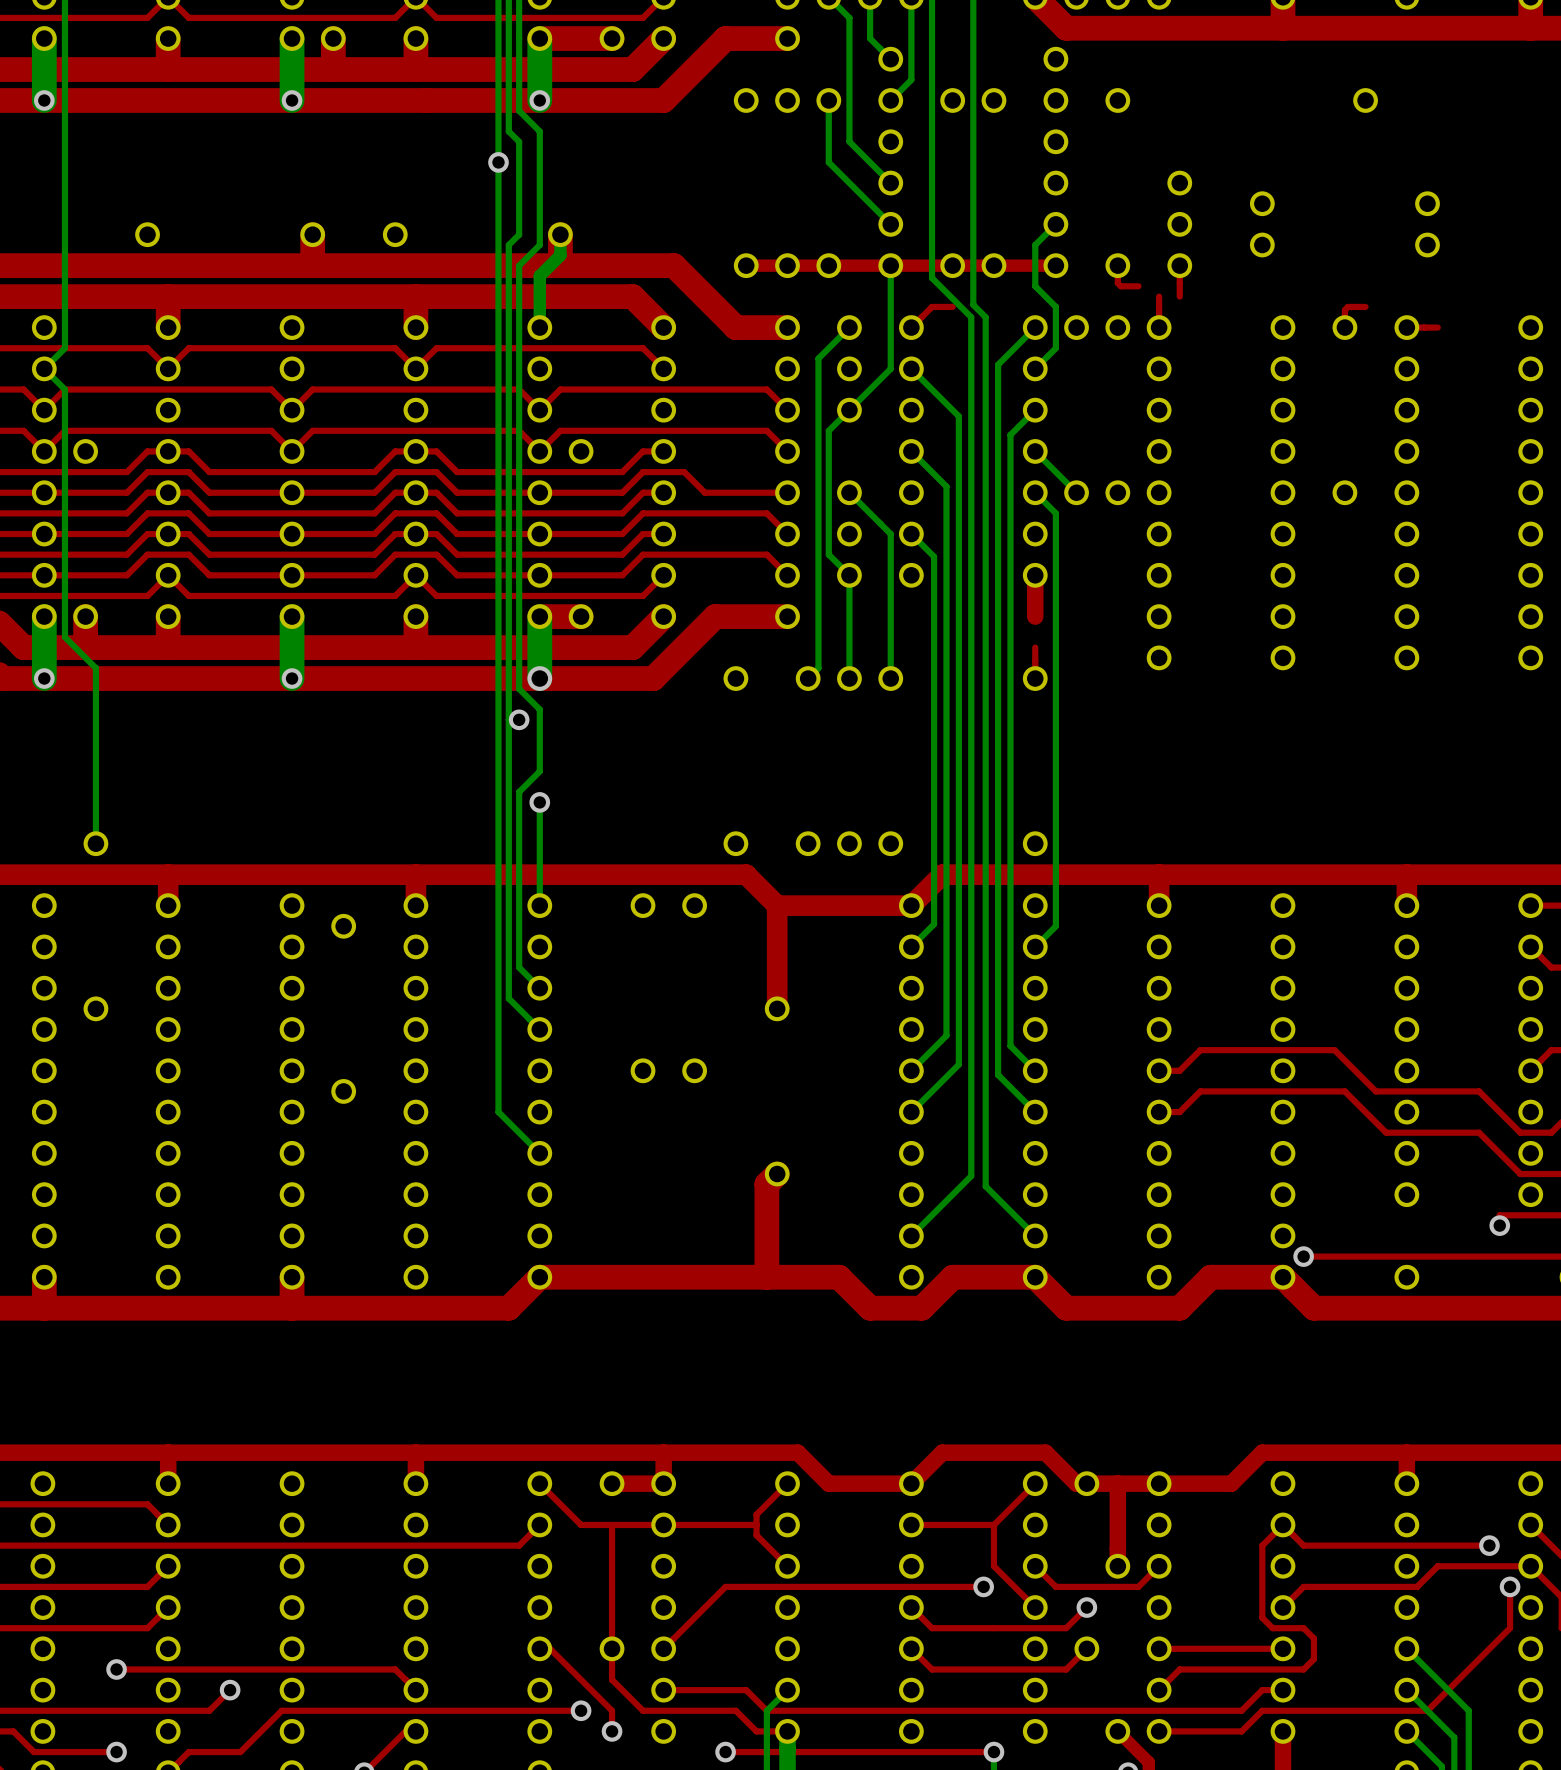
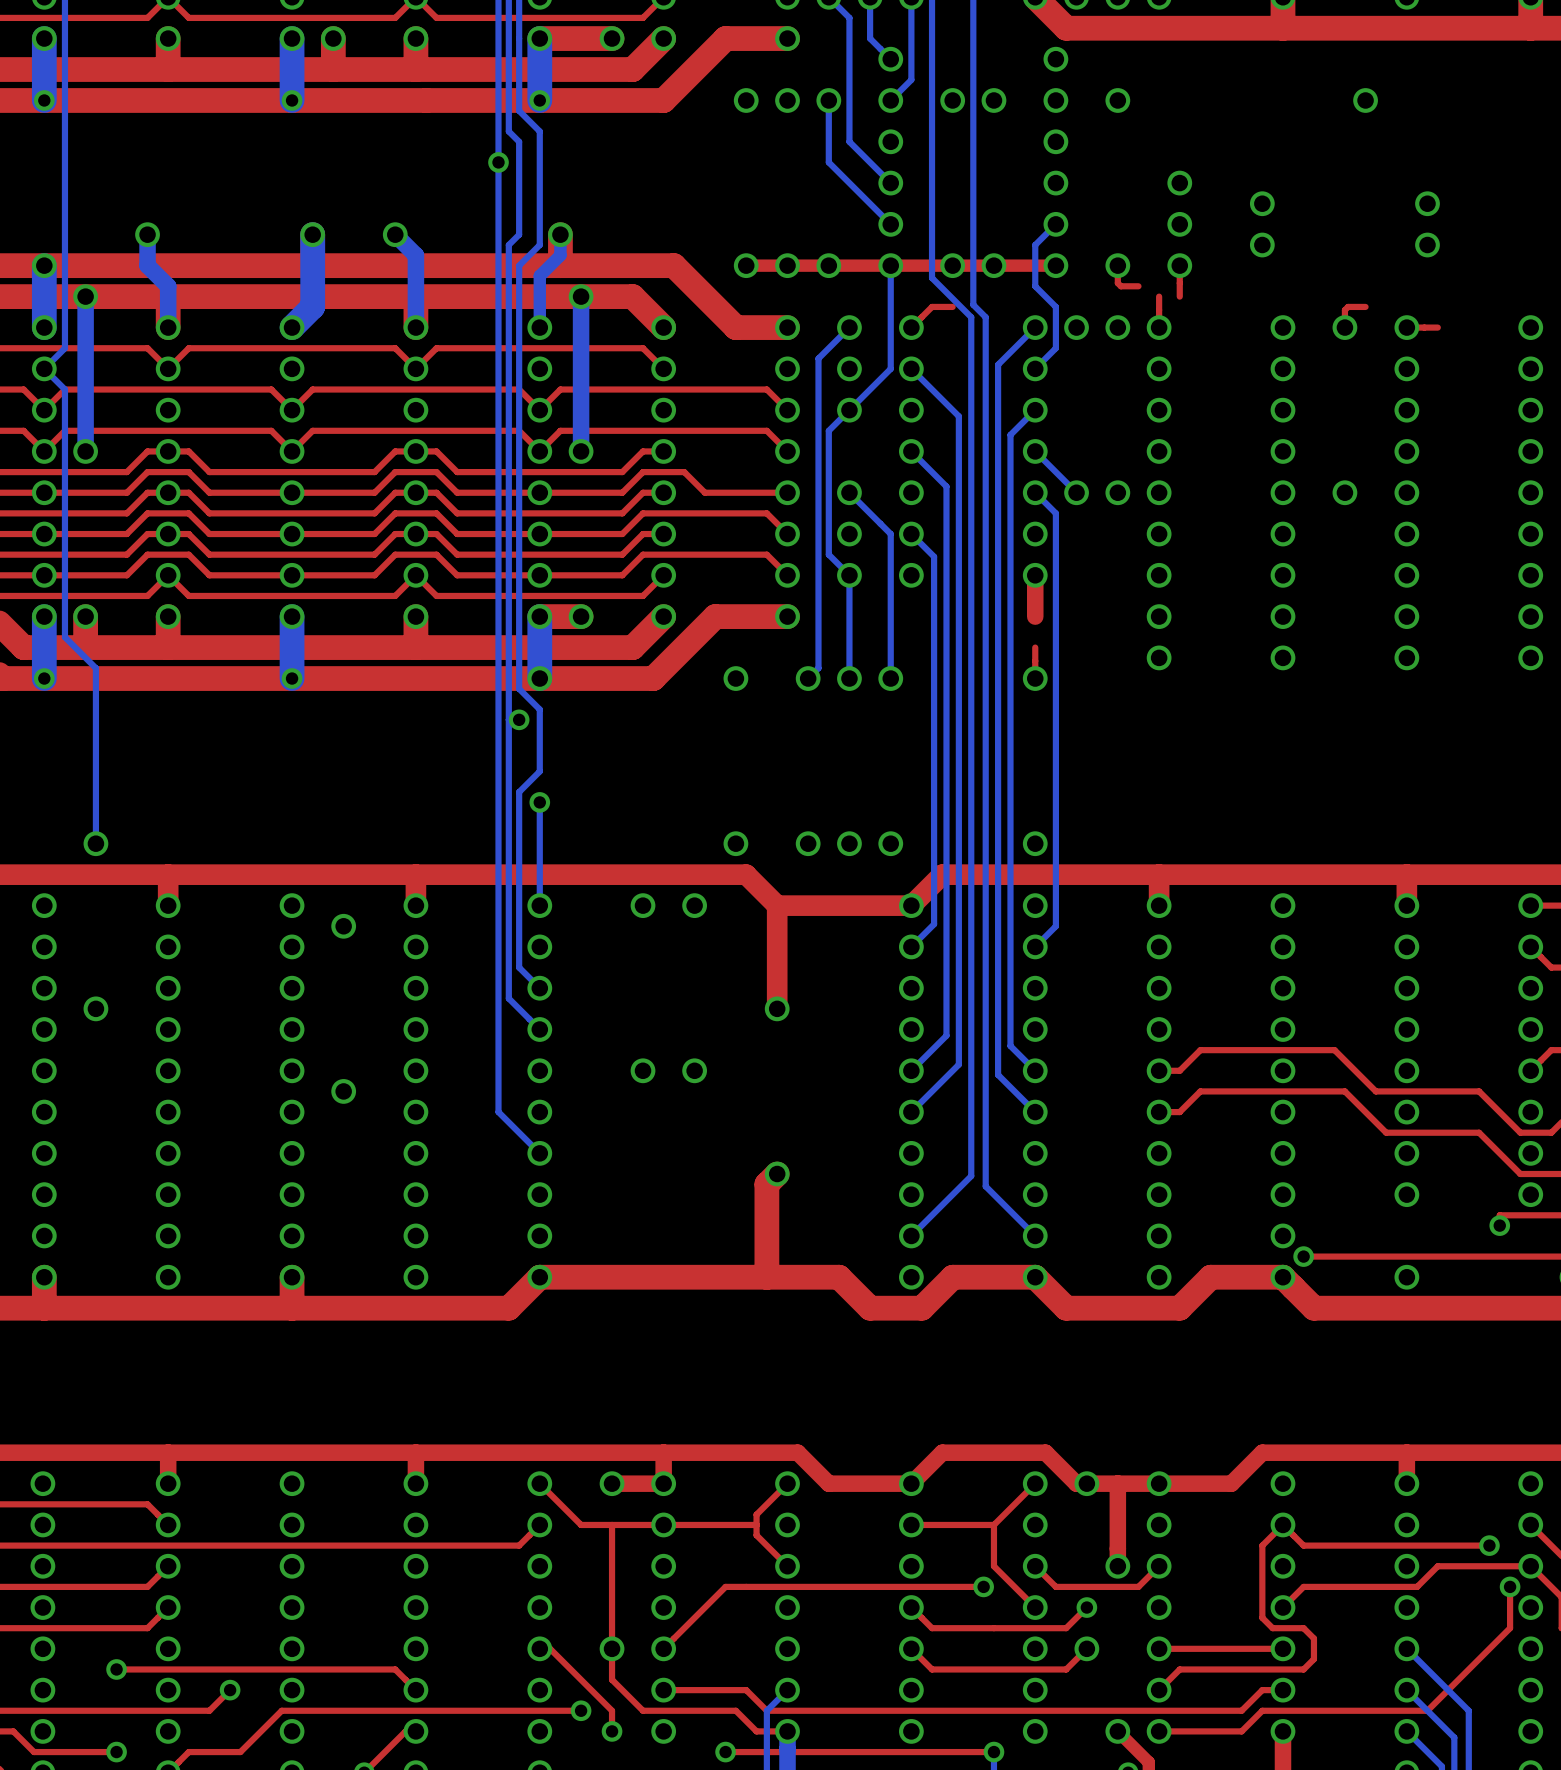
bottom track: none -> (147, 234) (147, 265) (168, 286) (168, 327)
bottom track: none -> (312, 234) (312, 306) (292, 327)
bottom track: none -> (395, 234) (415, 255) (415, 327)
bottom track: none -> (44, 265) (44, 327)
via: none -> (44, 265)
bottom track: none -> (85, 296) (85, 451)
via: none -> (85, 296)
bottom track: none -> (581, 296) (581, 451)
via: none -> (581, 296)

